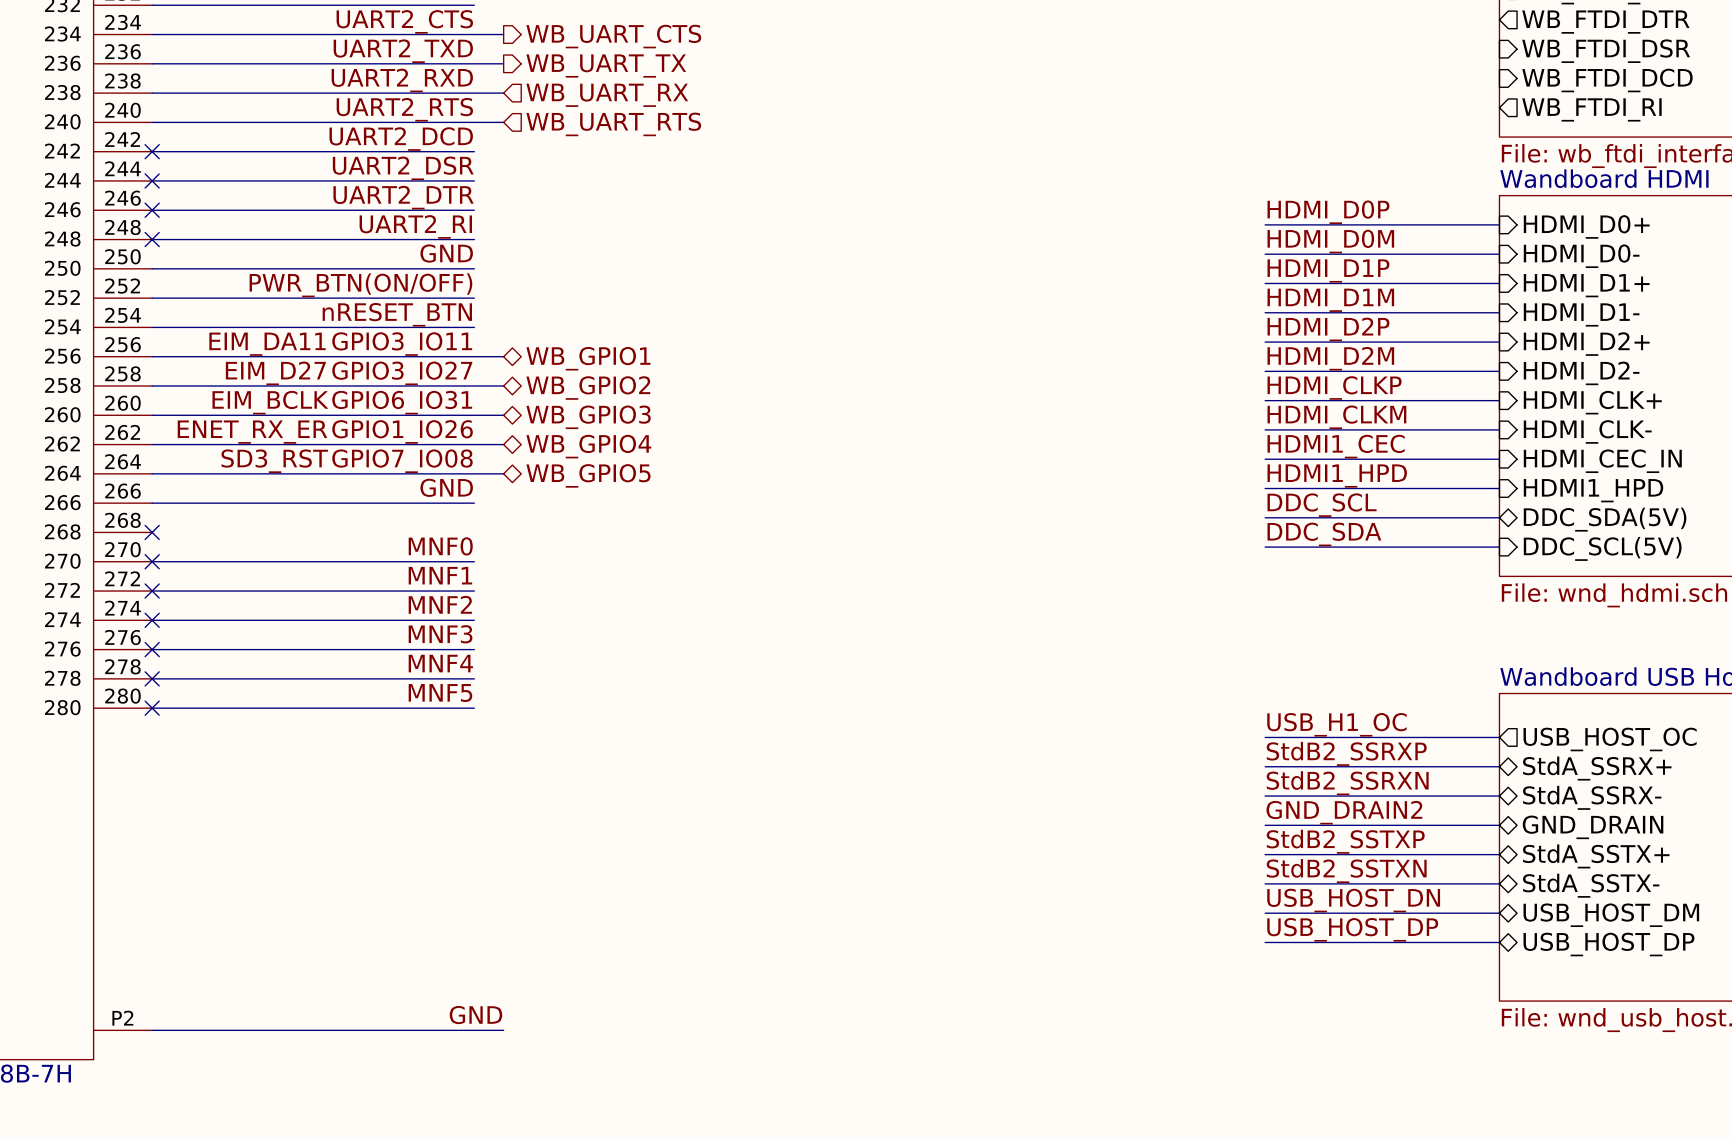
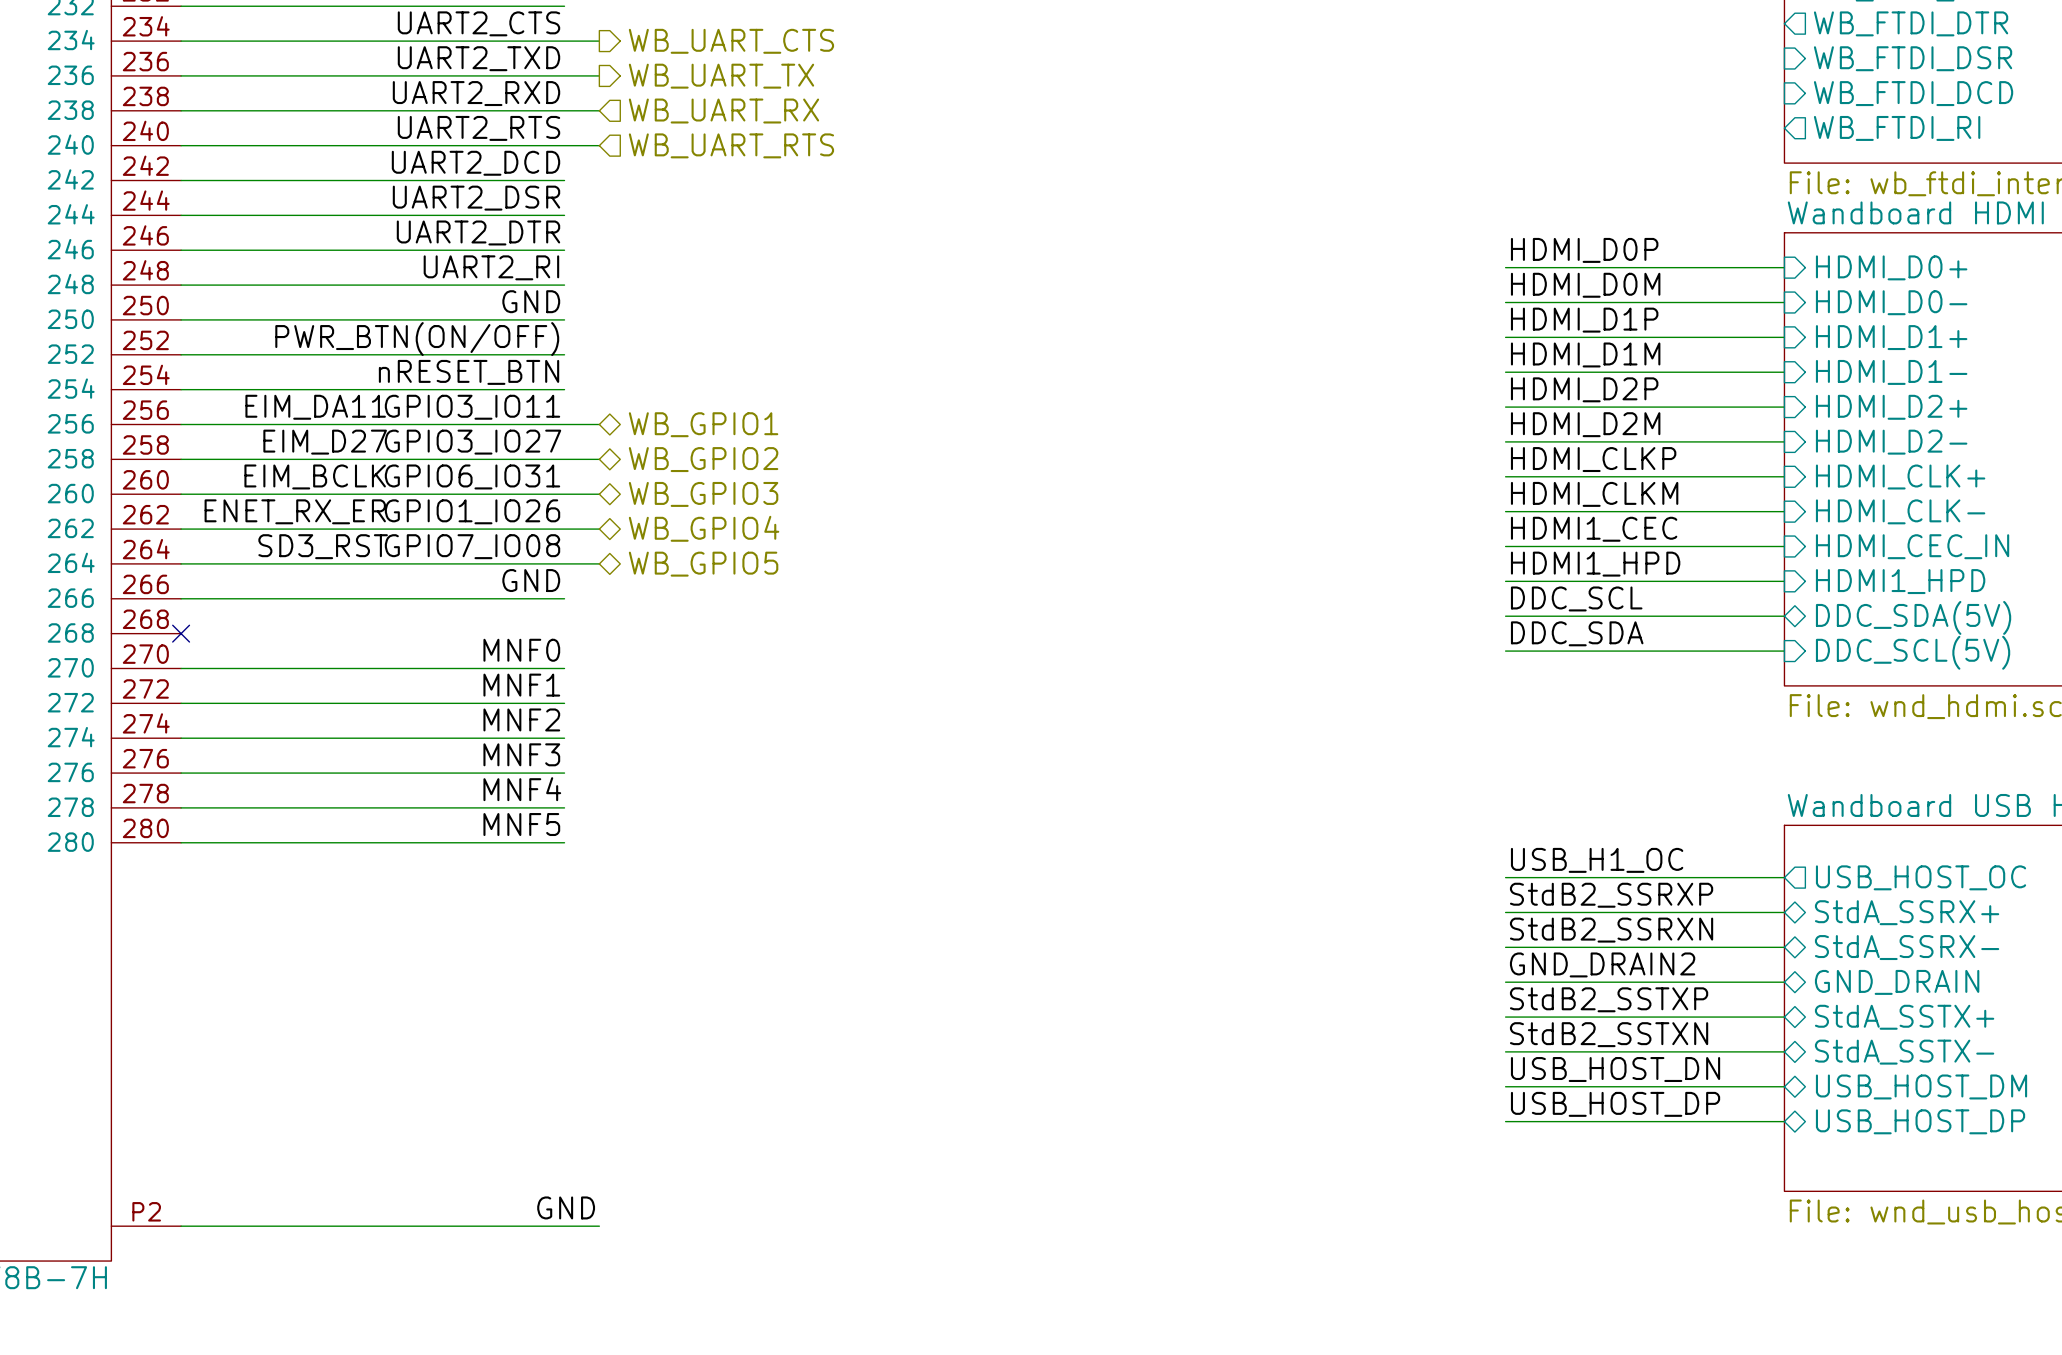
no-connect mark: (152, 151) -> none
no-connect mark: (152, 180) -> none
no-connect mark: (152, 210) -> none
no-connect mark: (152, 239) -> none
no-connect mark: (152, 561) -> none
no-connect mark: (152, 591) -> none
no-connect mark: (152, 620) -> none
no-connect mark: (152, 649) -> none
no-connect mark: (152, 678) -> none
no-connect mark: (152, 708) -> none

